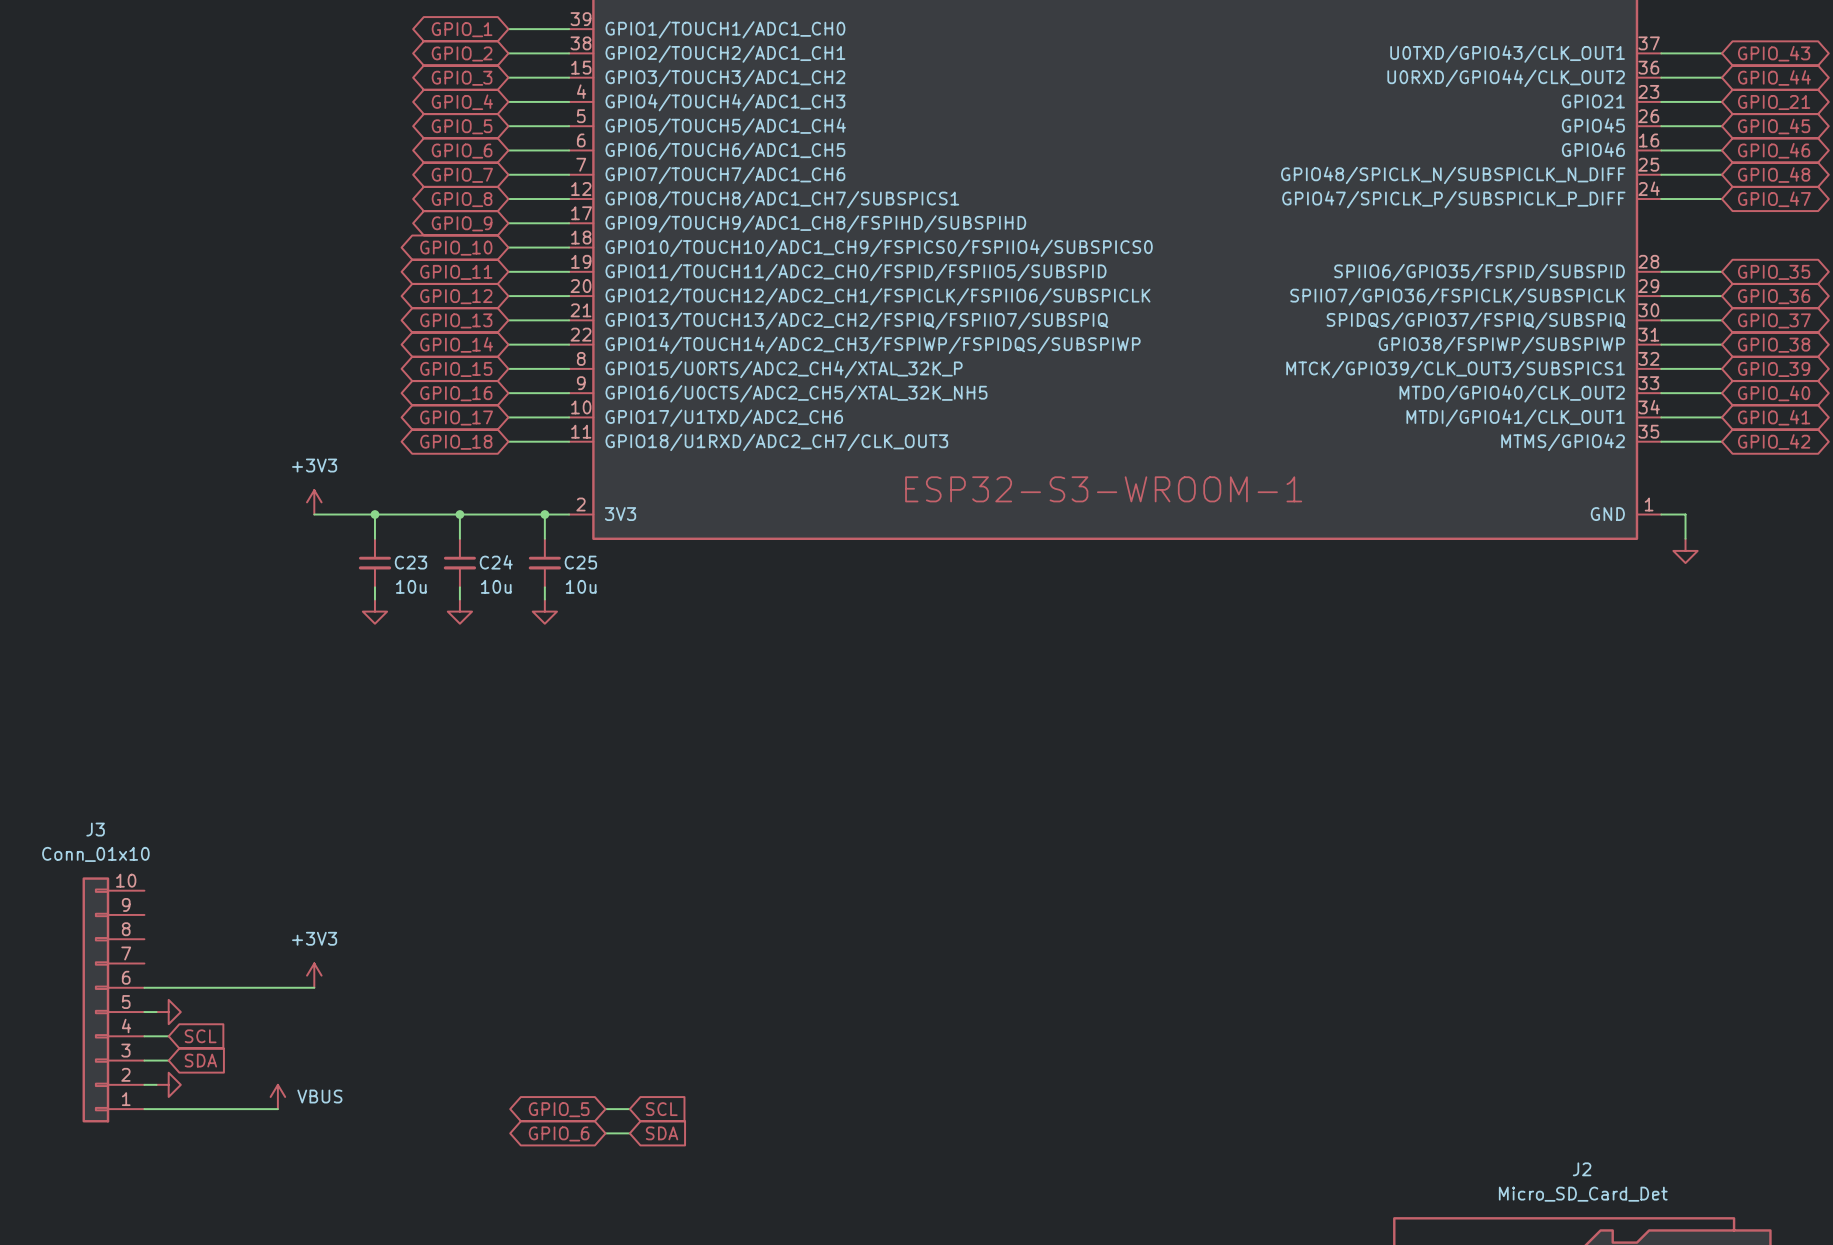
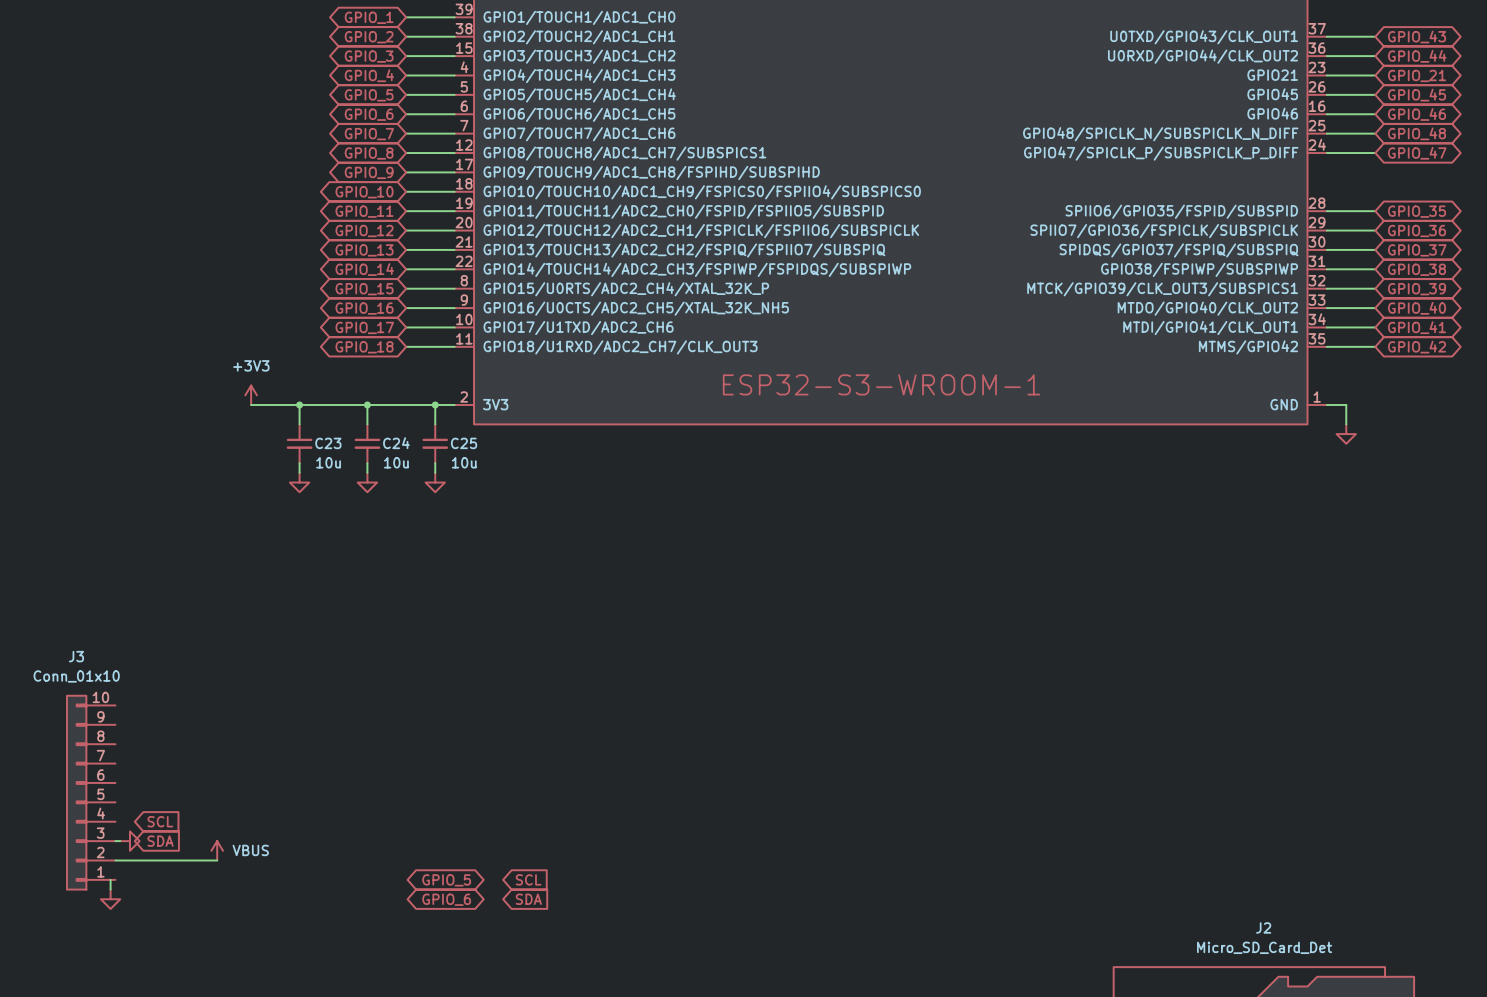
power symbol: +3V3 (314, 975) -> none
wire: (144, 987) (314, 987) -> none
wire: (144, 1012) (156, 1012) -> none
power symbol: (168, 1012) -> none
wire: (144, 1036) (168, 1036) -> none
power symbol: none -> (129, 841)
wire: none -> (125, 860) (217, 860)
power symbol: (168, 1084) -> none
power symbol position: VBUS (277, 1096) -> VBUS (217, 850)
wire: none -> (110, 879) (110, 889)
wire: (144, 1109) (277, 1109) -> none
wire: (605, 1109) (629, 1109) -> none
power symbol: none -> (110, 899)
wire: (605, 1133) (629, 1133) -> none

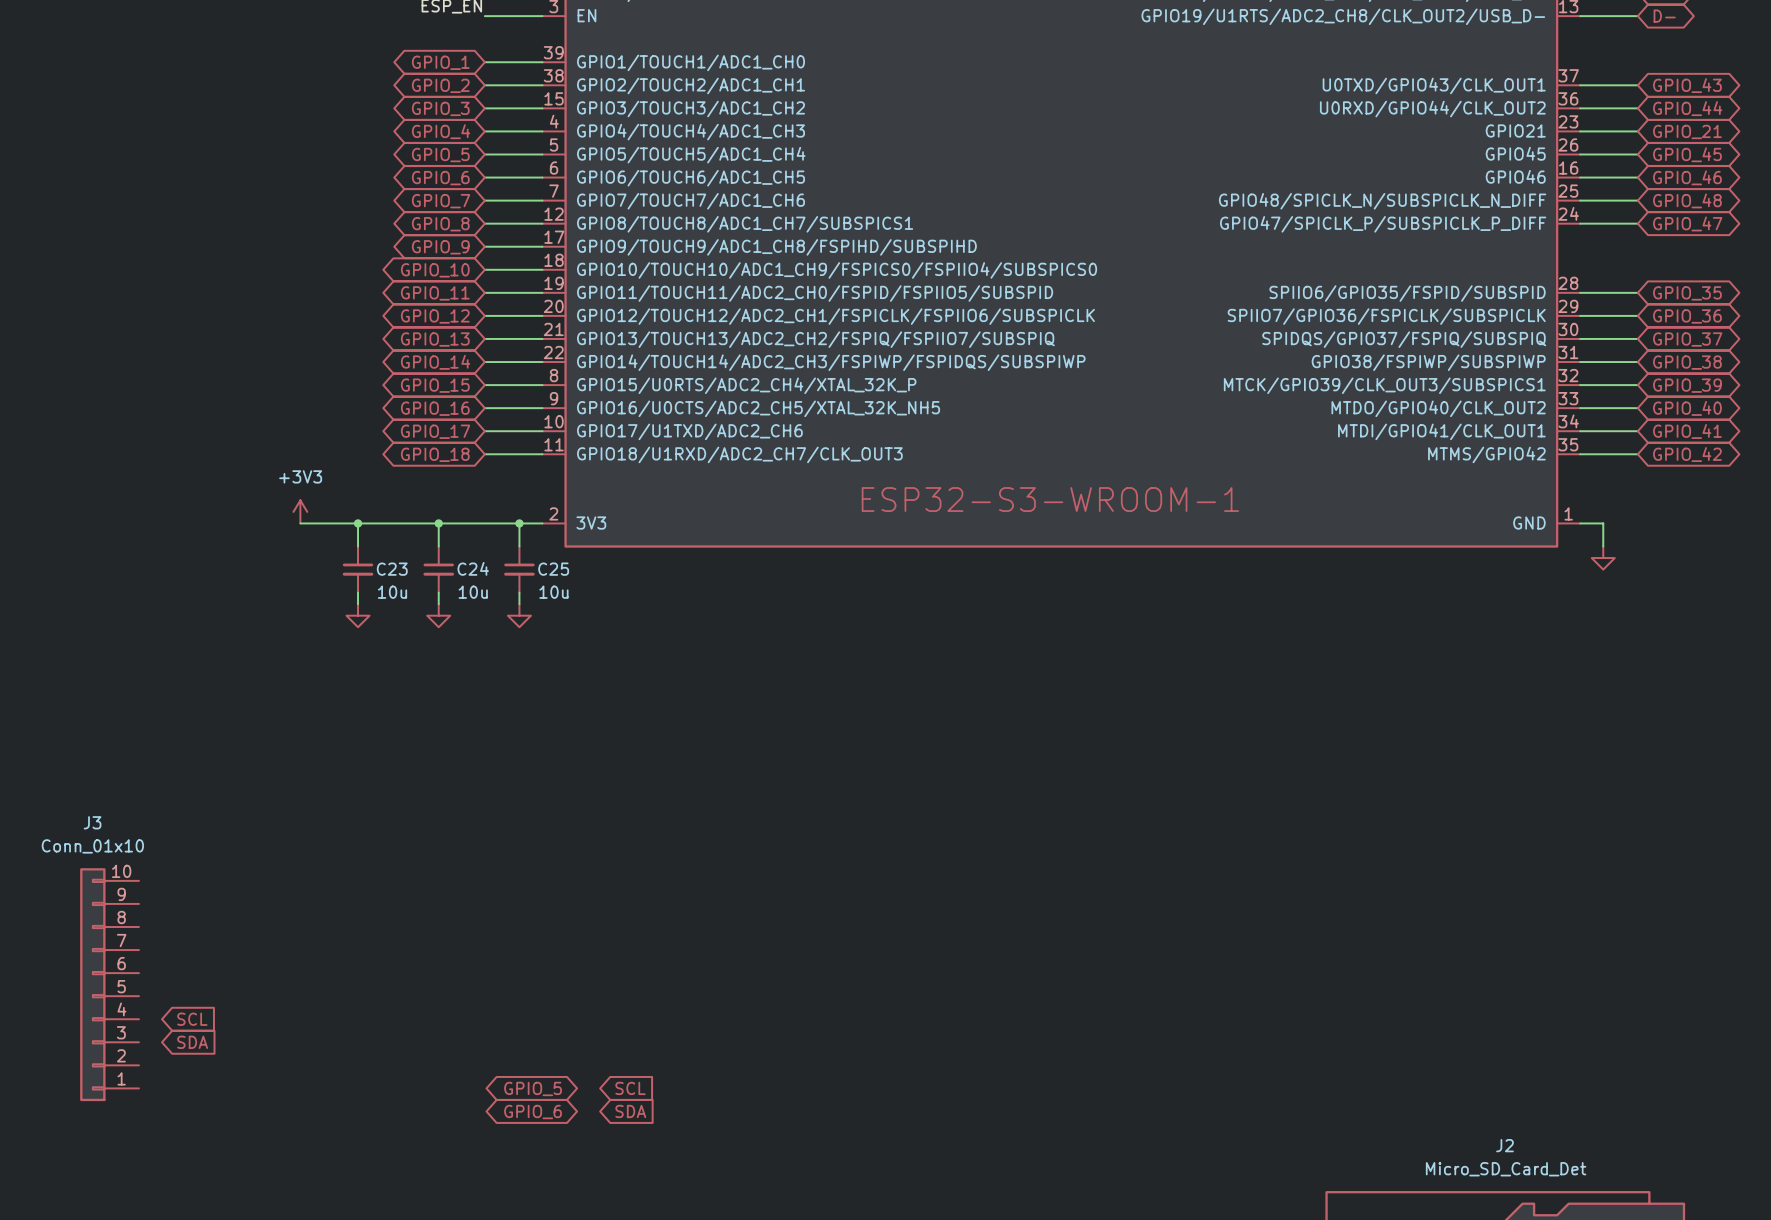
wire: (115, 841) (120, 841) -> none
power symbol: (129, 841) -> none
power symbol: VBUS (217, 850) -> none
wire: (115, 860) (217, 860) -> none
wire: (110, 879) (110, 889) -> none
power symbol: (110, 899) -> none

